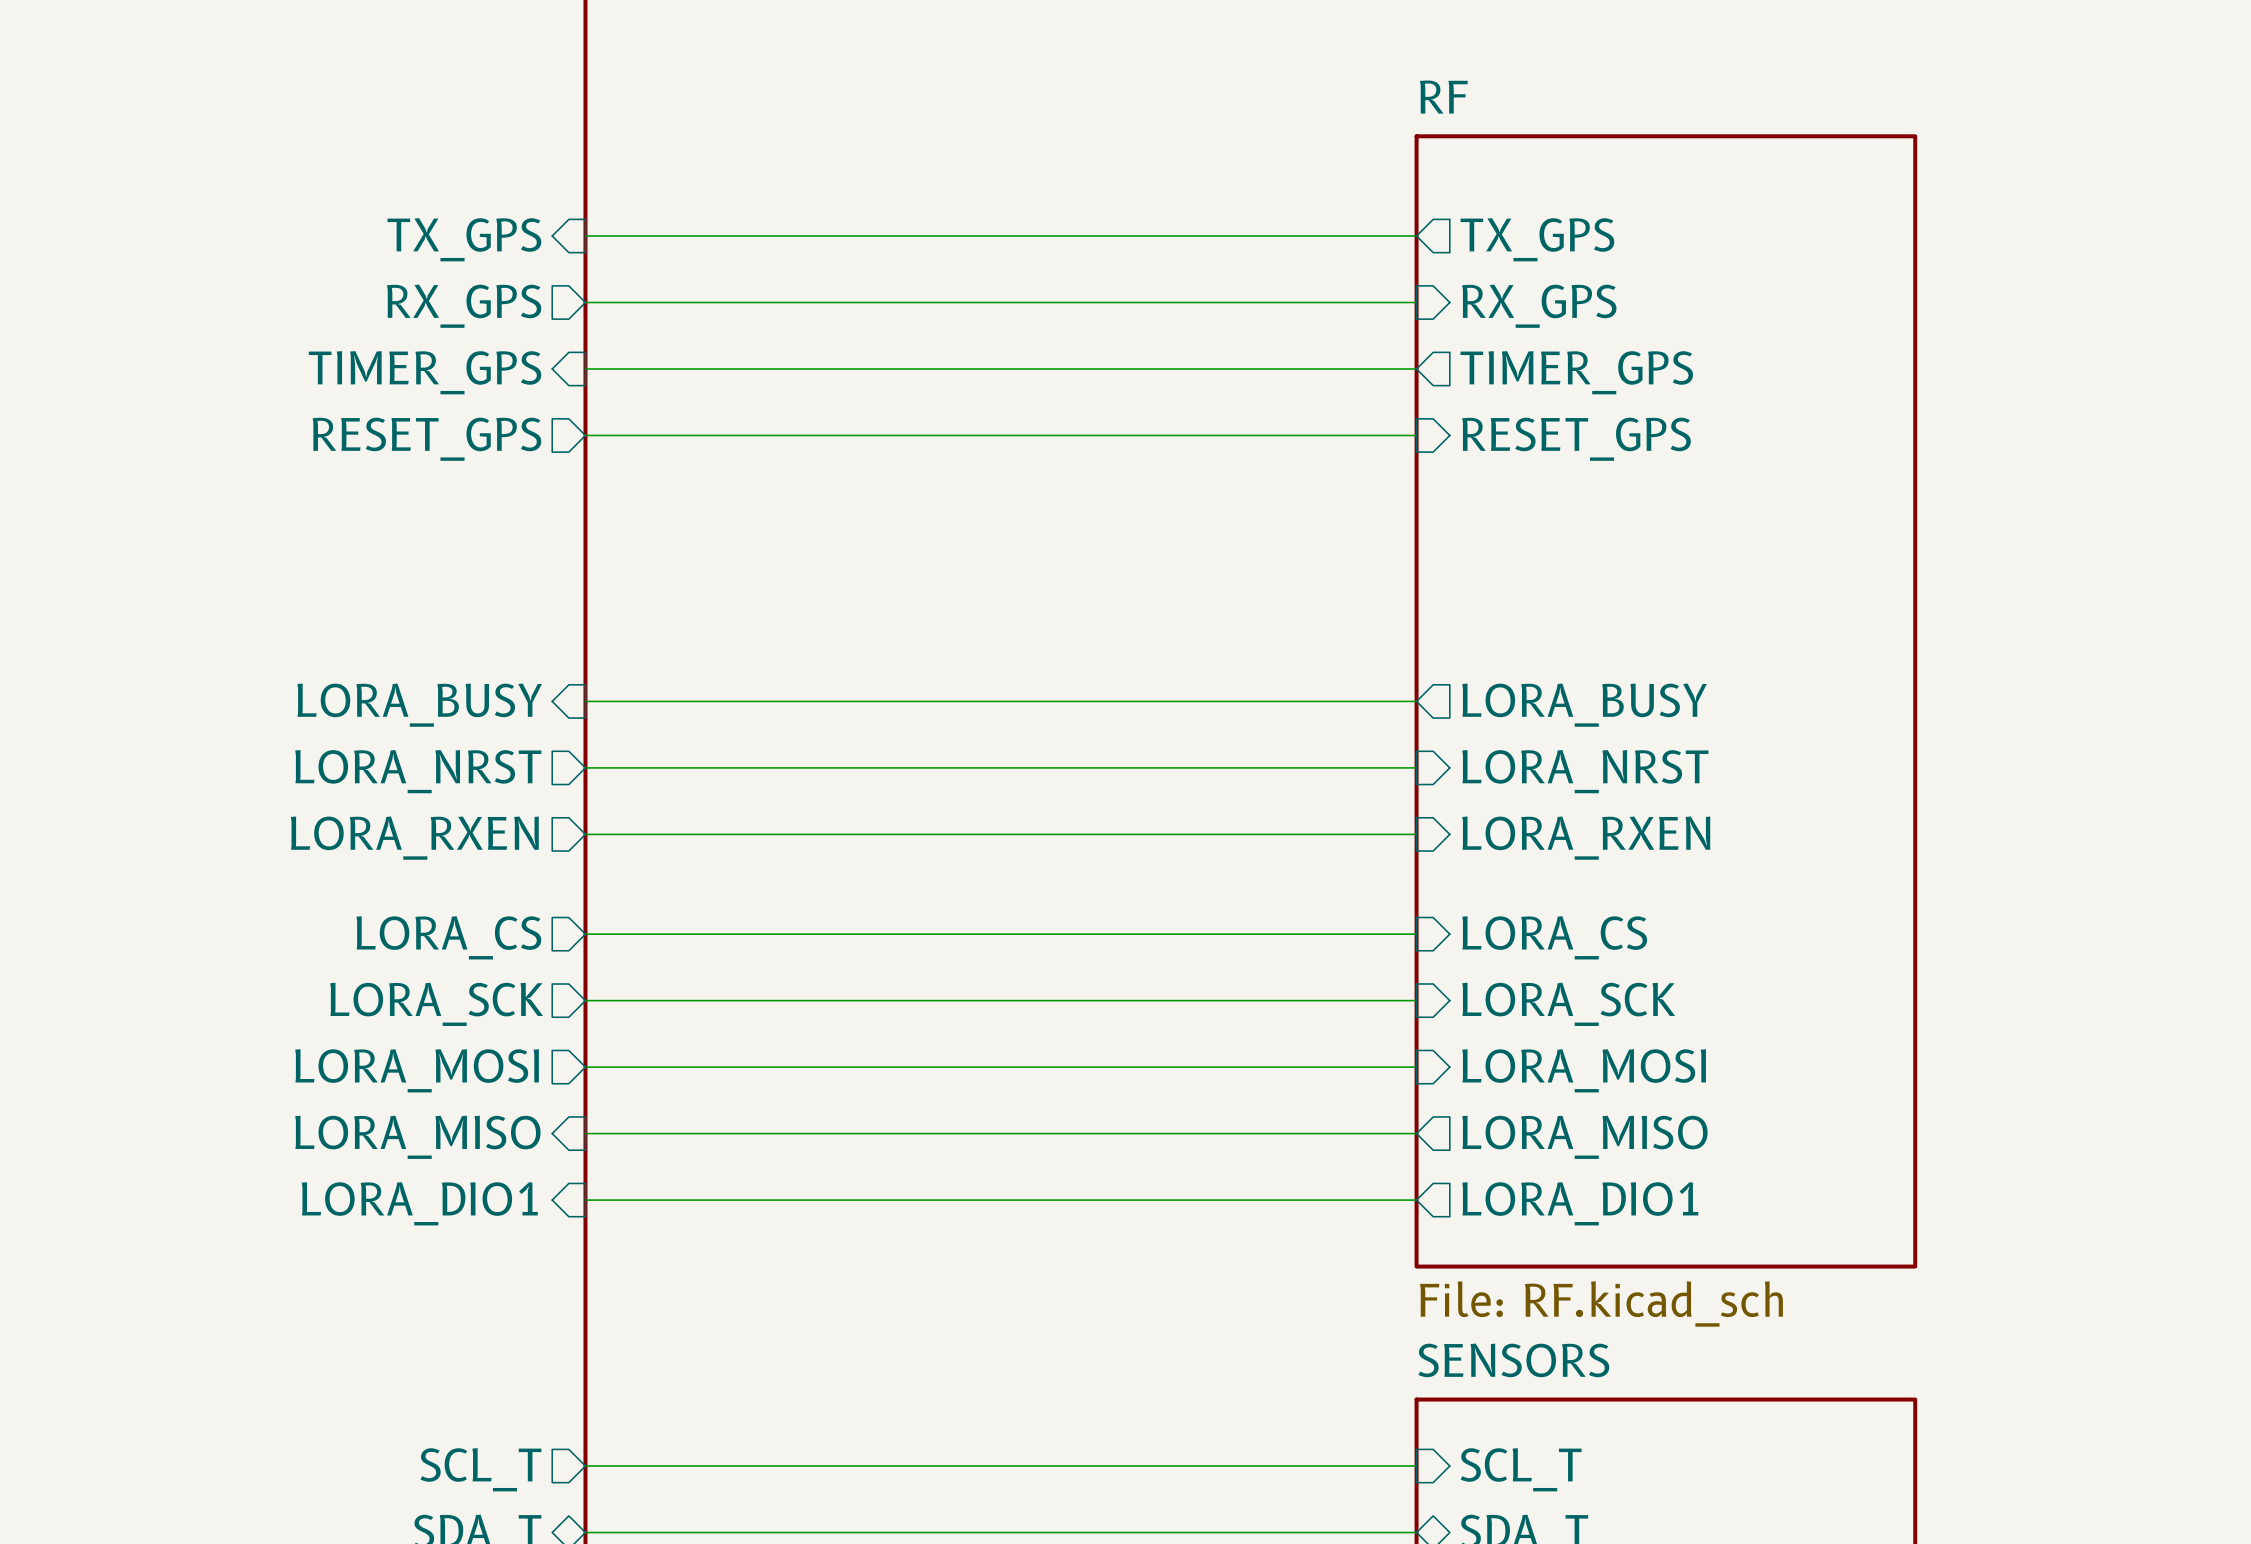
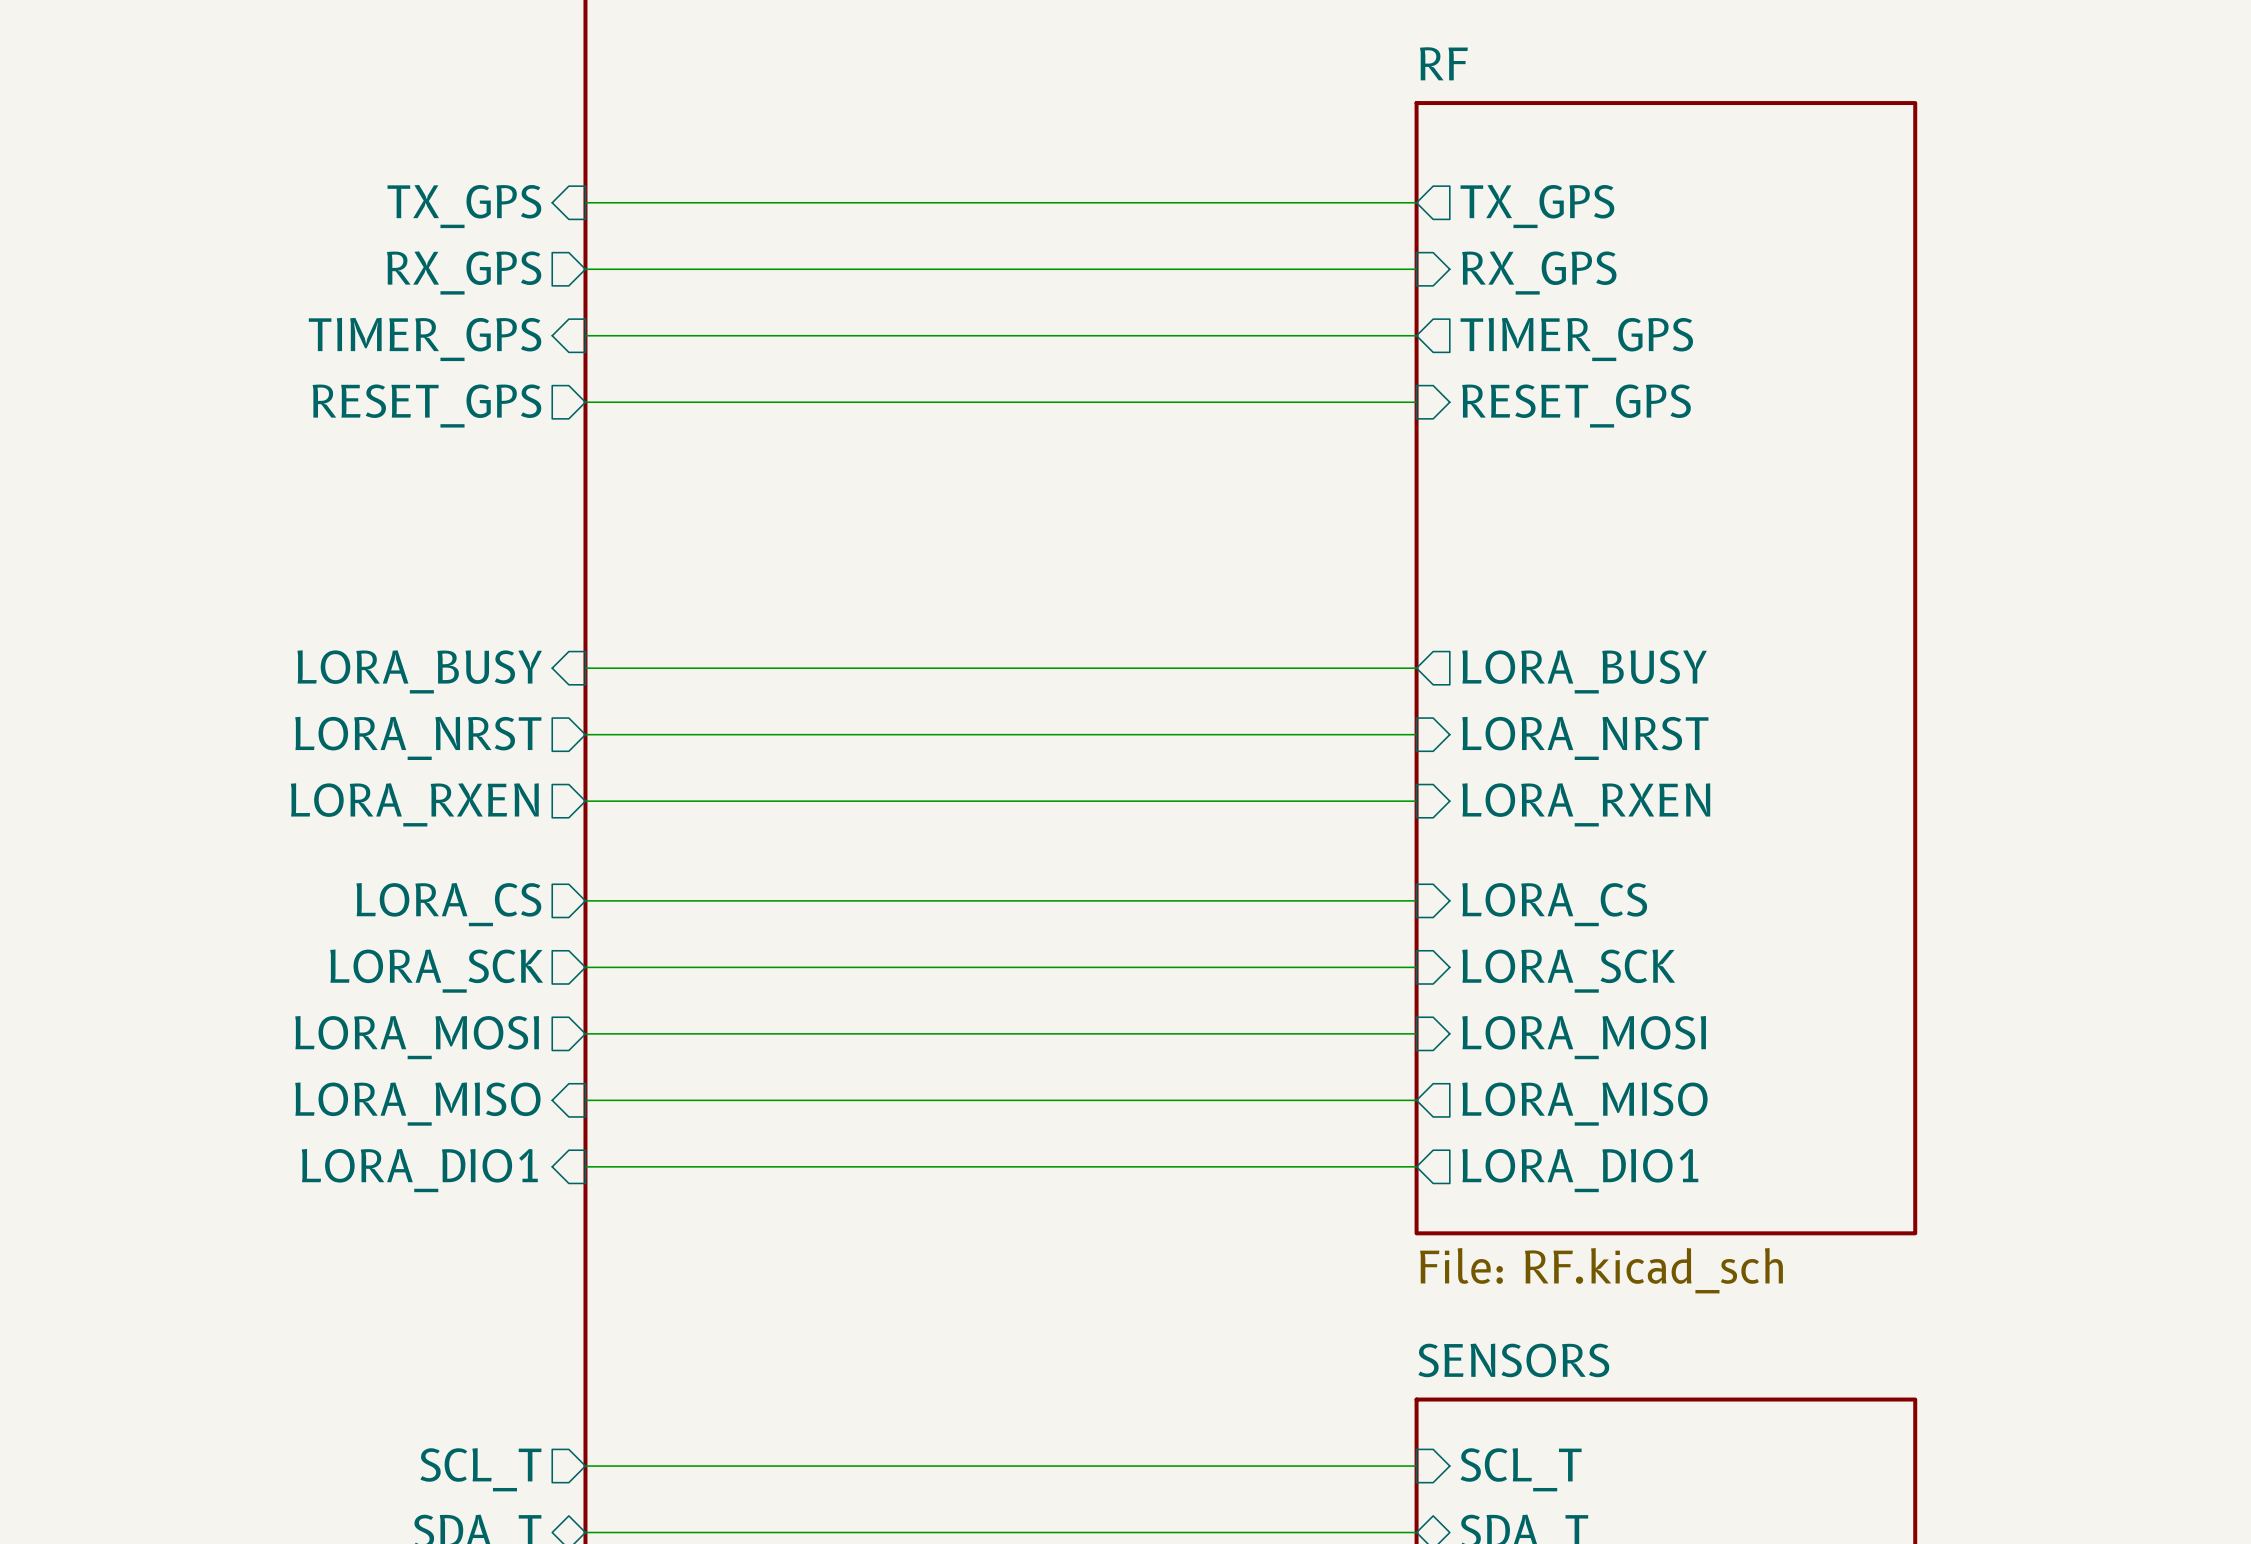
wire: (585, 236) (1416, 236) -> (585, 202) (1416, 202)
sheet pin position: TX_GPS (464, 239) -> TX_GPS (464, 206)
sheet pin position: TX_GPS (1537, 239) -> TX_GPS (1537, 206)
wire: (585, 302) (1416, 302) -> (585, 269) (1416, 269)
sheet pin position: RX_GPS (464, 306) -> RX_GPS (464, 272)
sheet pin position: RX_GPS (1539, 306) -> RX_GPS (1539, 272)
wire: (585, 368) (1416, 368) -> (585, 335) (1416, 335)
sheet pin position: TIMER_GPS (425, 372) -> TIMER_GPS (425, 339)
sheet pin position: TIMER_GPS (1576, 372) -> TIMER_GPS (1576, 339)
wire: (585, 435) (1416, 435) -> (585, 402) (1416, 402)
sheet pin position: RESET_GPS (426, 439) -> RESET_GPS (426, 406)
sheet pin position: RESET_GPS (1576, 439) -> RESET_GPS (1576, 406)
wire: (585, 701) (1416, 701) -> (585, 668) (1416, 668)
sheet RF position: (1665, 701) -> (1665, 668)
sheet pin position: LORA_BUSY (419, 705) -> LORA_BUSY (419, 671)
sheet pin position: LORA_BUSY (1584, 705) -> LORA_BUSY (1584, 671)
wire: (585, 767) (1416, 767) -> (585, 734) (1416, 734)
sheet pin position: LORA_NRST (418, 771) -> LORA_NRST (418, 738)
sheet pin position: LORA_NRST (1585, 771) -> LORA_NRST (1585, 738)
wire: (585, 834) (1416, 834) -> (585, 801) (1416, 801)
sheet pin position: LORA_RXEN (414, 838) -> LORA_RXEN (414, 804)
sheet pin position: LORA_RXEN (1586, 838) -> LORA_RXEN (1586, 804)
wire: (585, 934) (1416, 934) -> (585, 900) (1416, 900)
sheet pin position: LORA_CS (448, 937) -> LORA_CS (448, 904)
sheet pin position: LORA_CS (1554, 937) -> LORA_CS (1554, 904)
wire: (585, 1000) (1416, 1000) -> (585, 967) (1416, 967)
sheet pin position: LORA_SCK (436, 1004) -> LORA_SCK (436, 971)
sheet pin position: LORA_SCK (1568, 1004) -> LORA_SCK (1568, 971)
wire: (585, 1067) (1416, 1067) -> (585, 1033) (1416, 1033)
sheet pin position: LORA_MOSI (417, 1070) -> LORA_MOSI (417, 1037)
sheet pin position: LORA_MOSI (1584, 1070) -> LORA_MOSI (1584, 1037)
wire: (585, 1133) (1416, 1133) -> (585, 1100) (1416, 1100)
sheet pin position: LORA_MISO (417, 1137) -> LORA_MISO (417, 1104)
sheet pin position: LORA_MISO (1584, 1137) -> LORA_MISO (1584, 1104)
wire: (585, 1200) (1416, 1200) -> (585, 1166) (1416, 1166)
sheet pin position: LORA_DIO1 (419, 1203) -> LORA_DIO1 (419, 1170)
sheet pin position: LORA_DIO1 (1580, 1203) -> LORA_DIO1 (1580, 1170)

